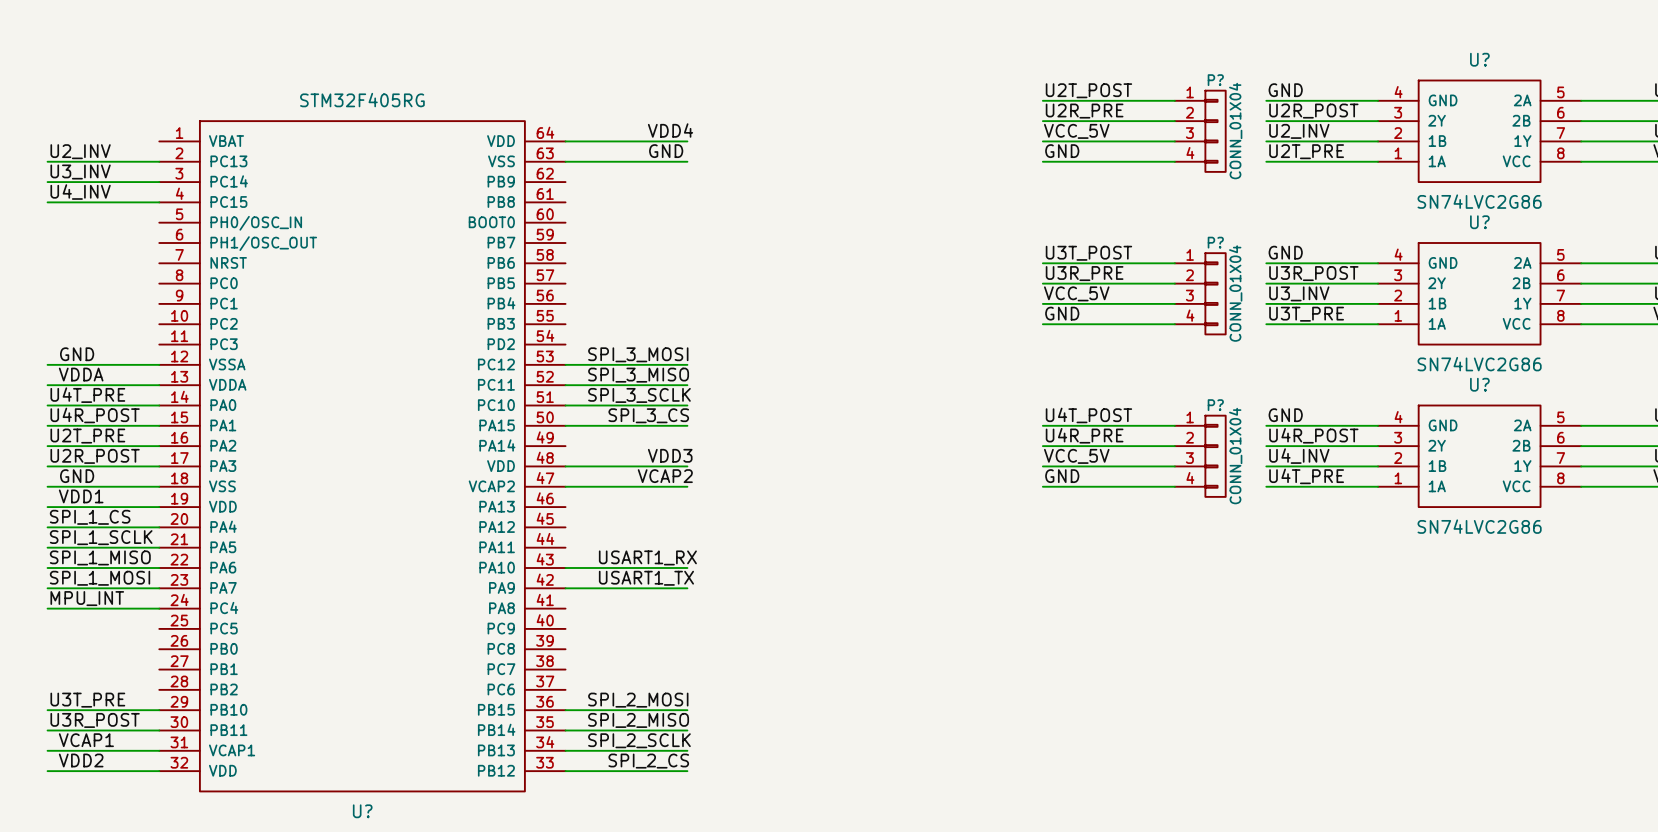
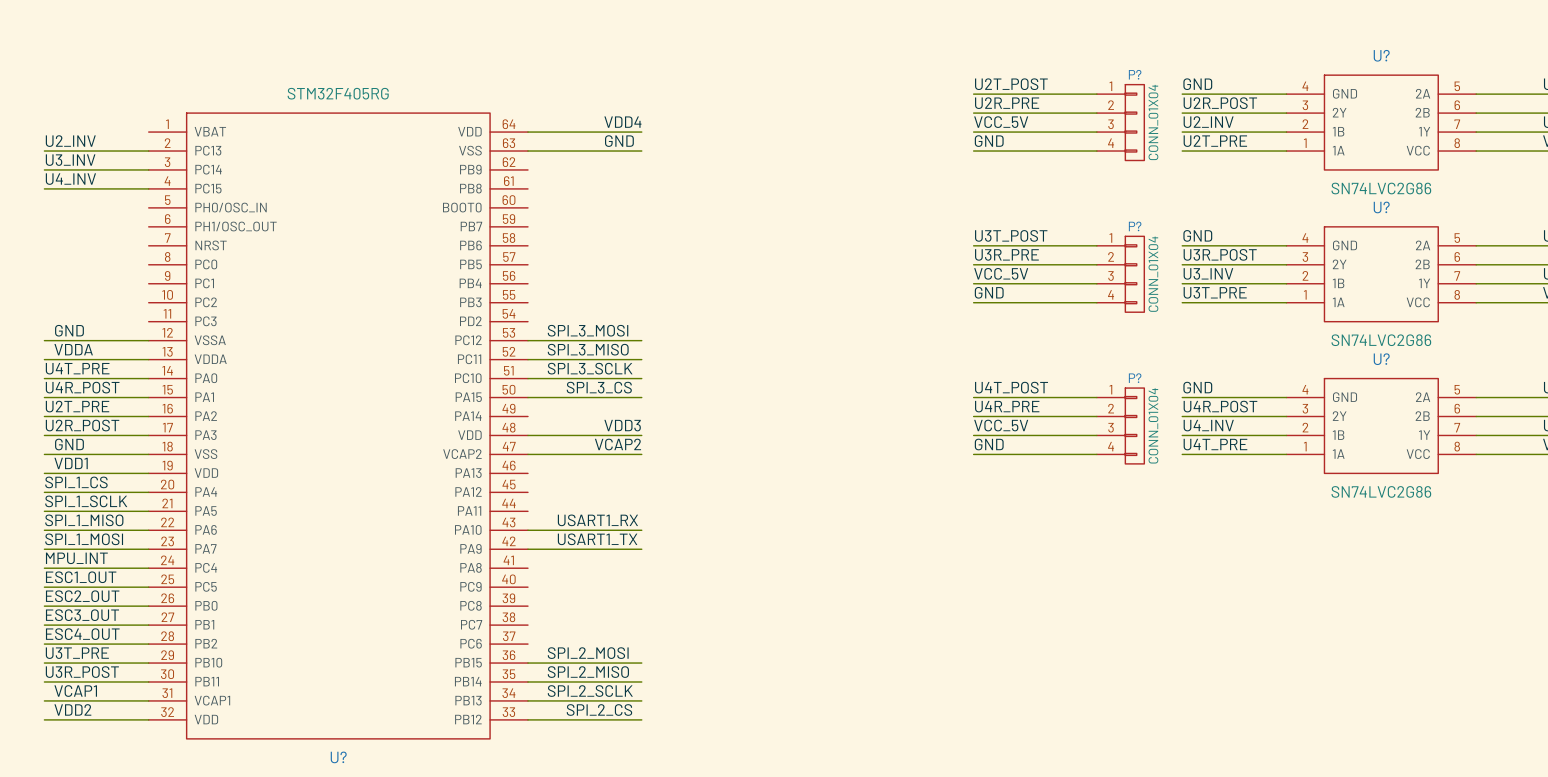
label: none -> ESC1_OUT (81, 577)
wire: none -> (44, 587) (148, 587)
label: none -> ESC2_OUT (82, 596)
wire: none -> (44, 606) (148, 606)
label: none -> ESC3_OUT (82, 615)
wire: none -> (44, 625) (148, 625)
label: none -> ESC4_OUT (82, 634)
wire: none -> (44, 644) (148, 644)

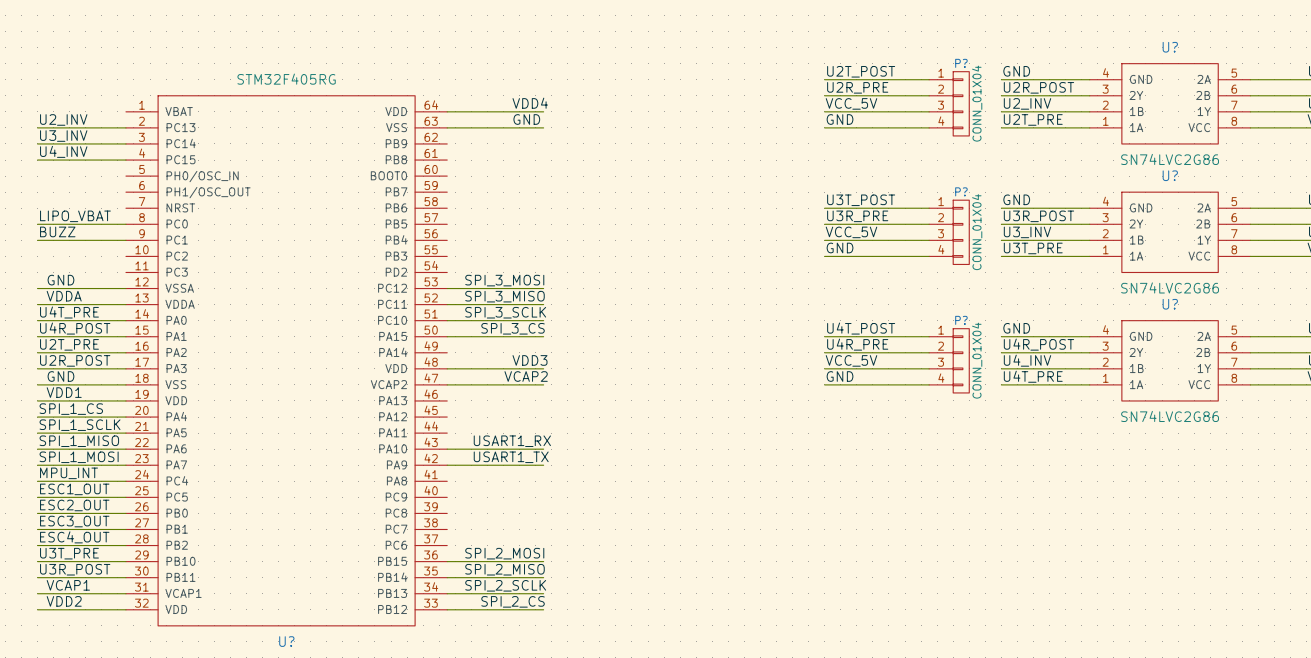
label: none -> LIPO_VBAT (75, 216)
wire: none -> (37, 224) (125, 224)
label: none -> BUZZ (57, 231)
wire: none -> (37, 240) (125, 240)

